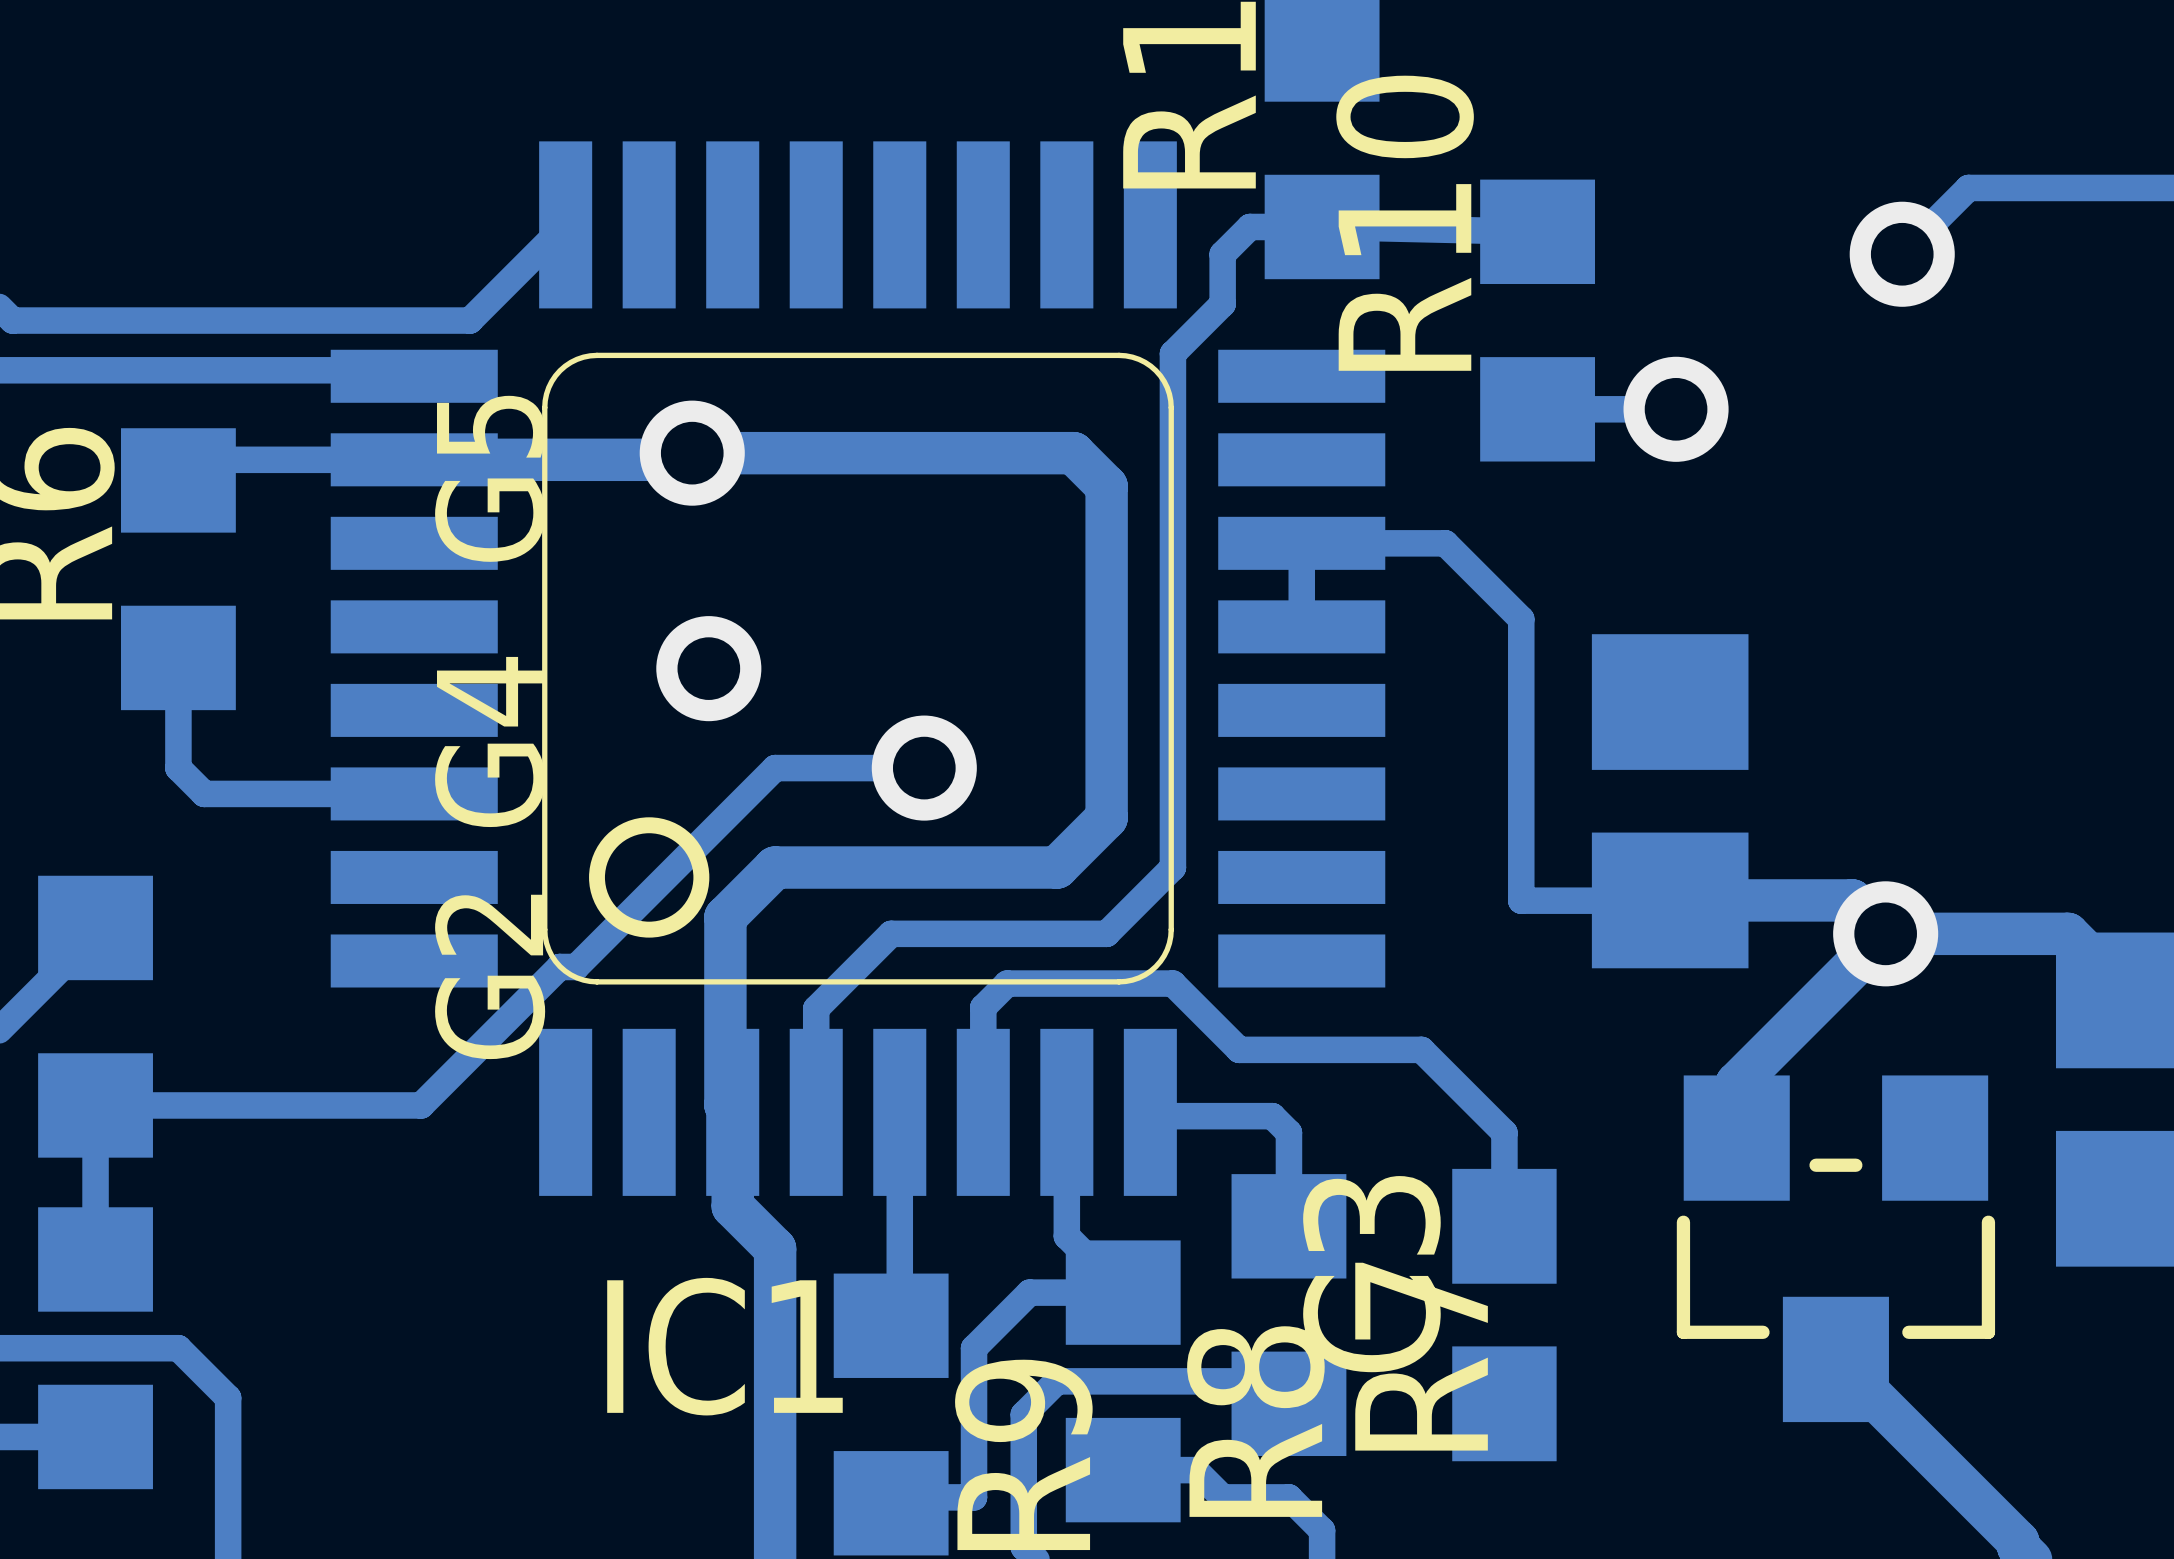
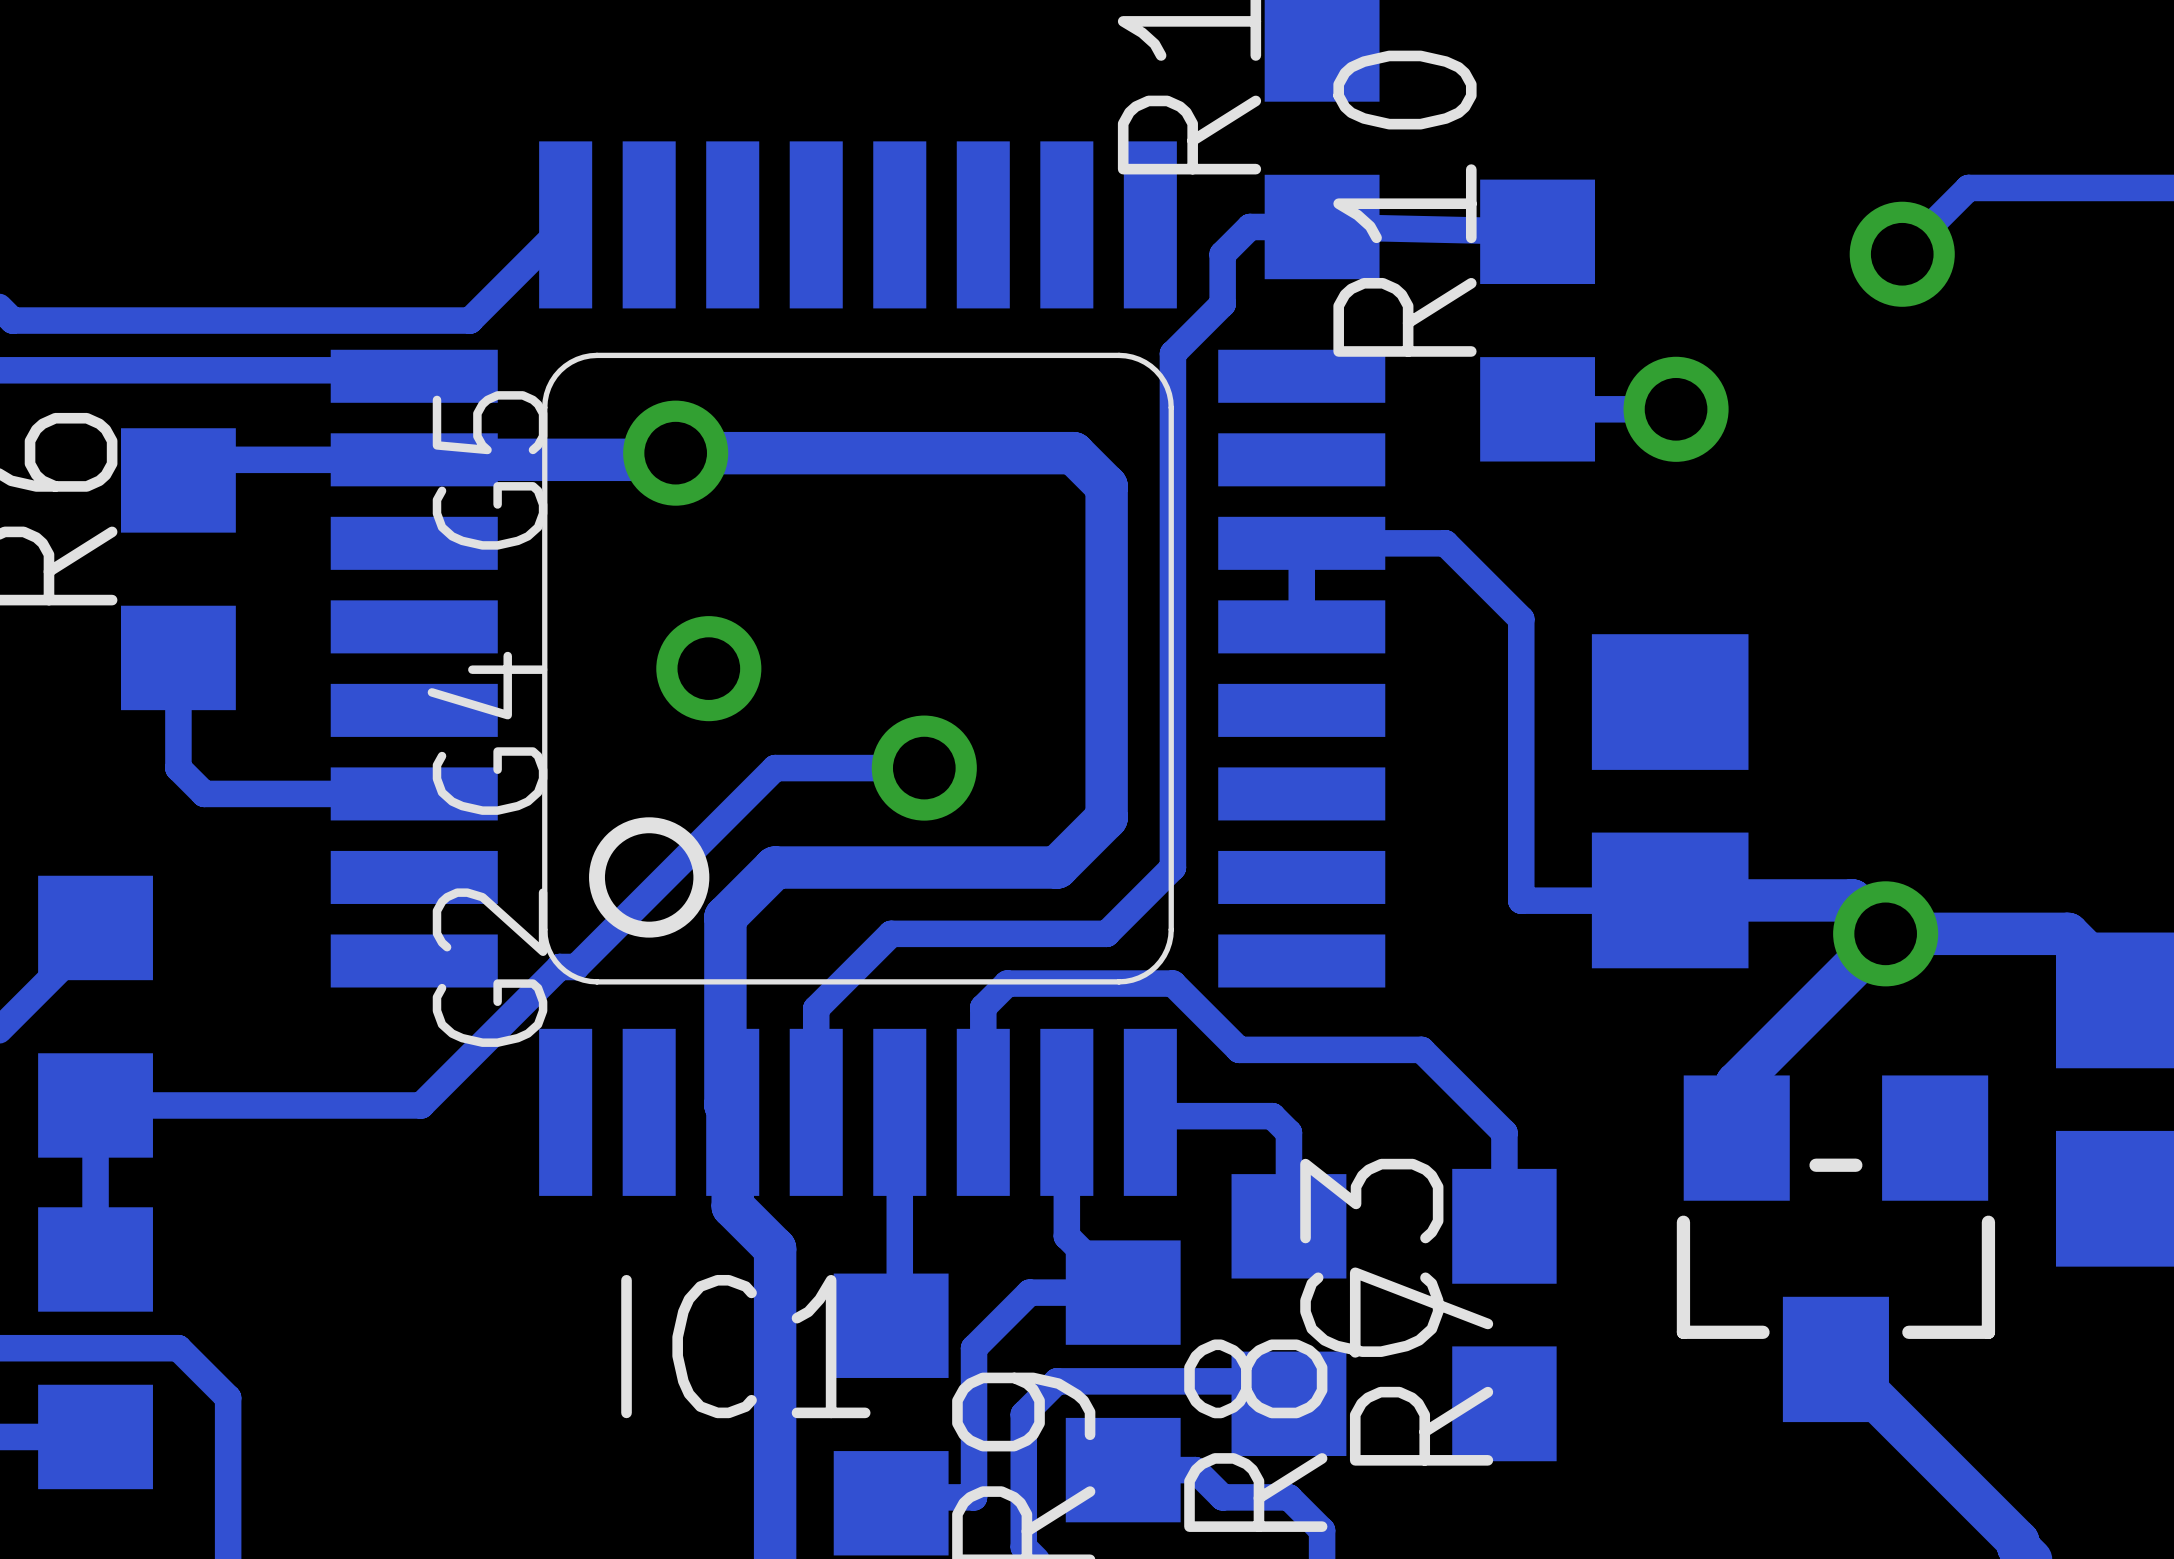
via position: (692, 453) -> (675, 453)

